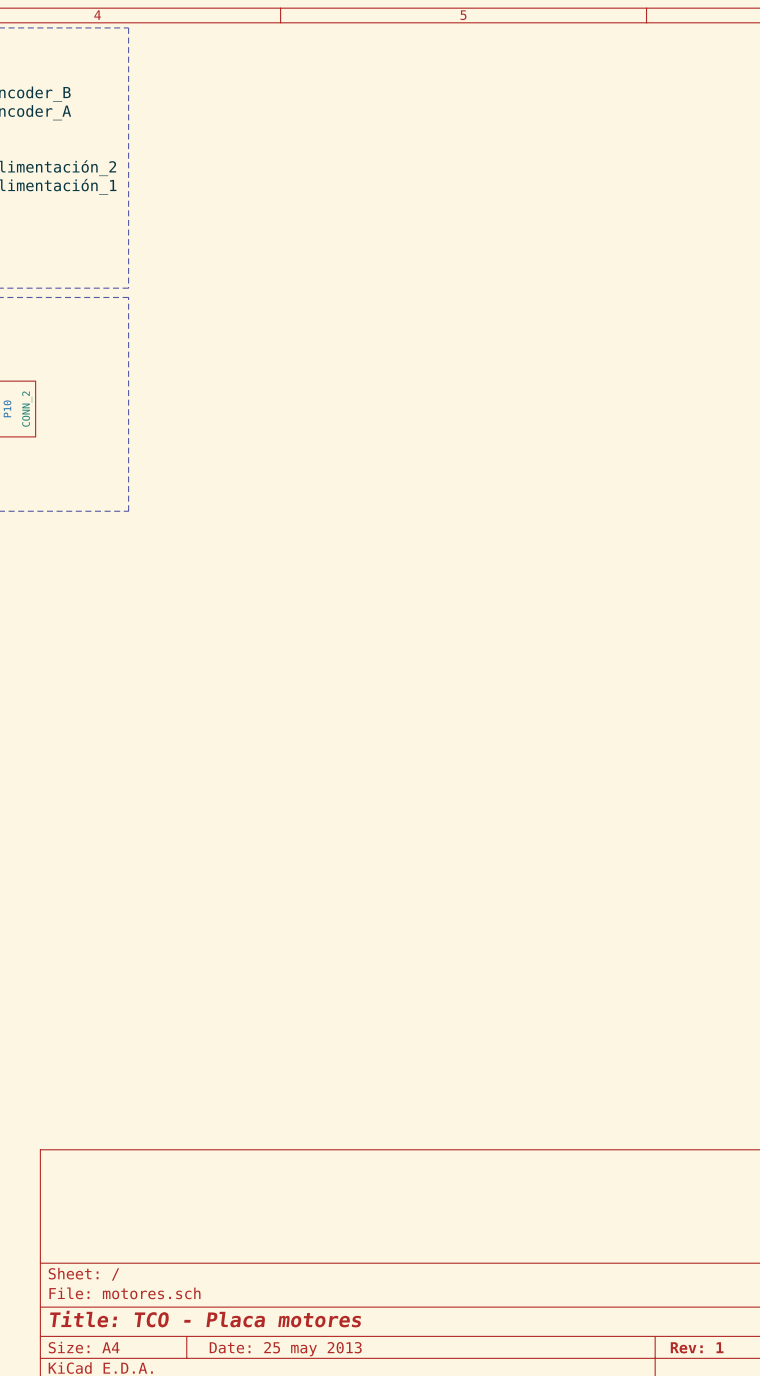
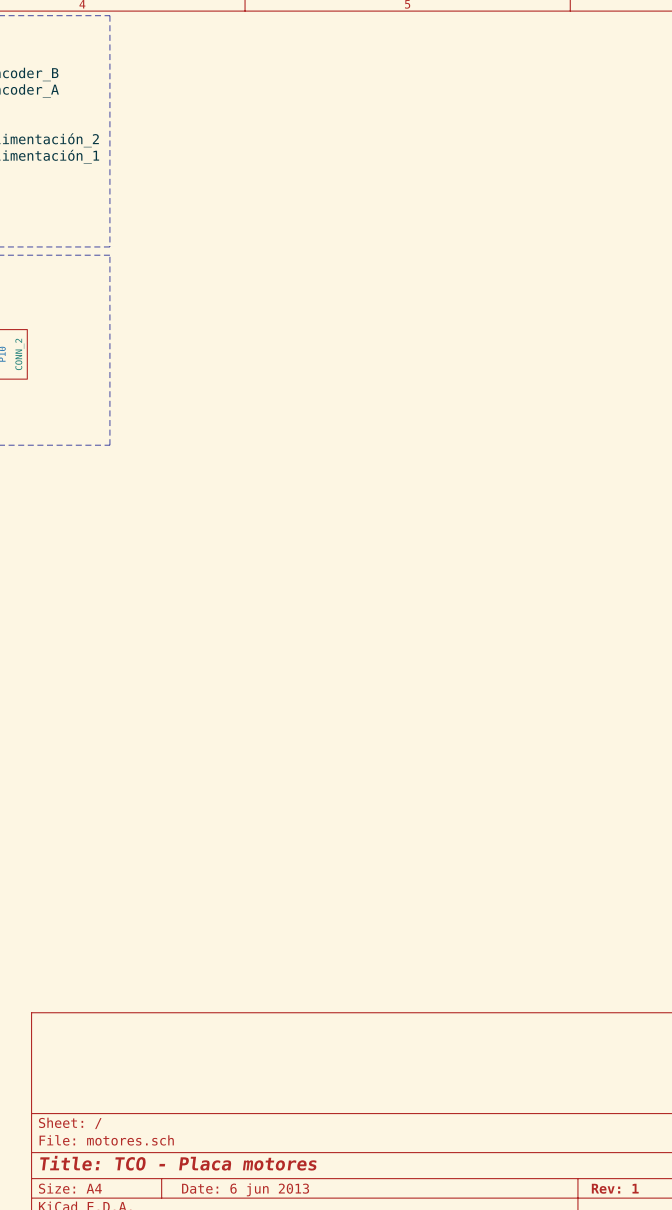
title block: Date: 25 may 2013 (285, 1349) -> Date: 6 jun 2013 (245, 1189)

